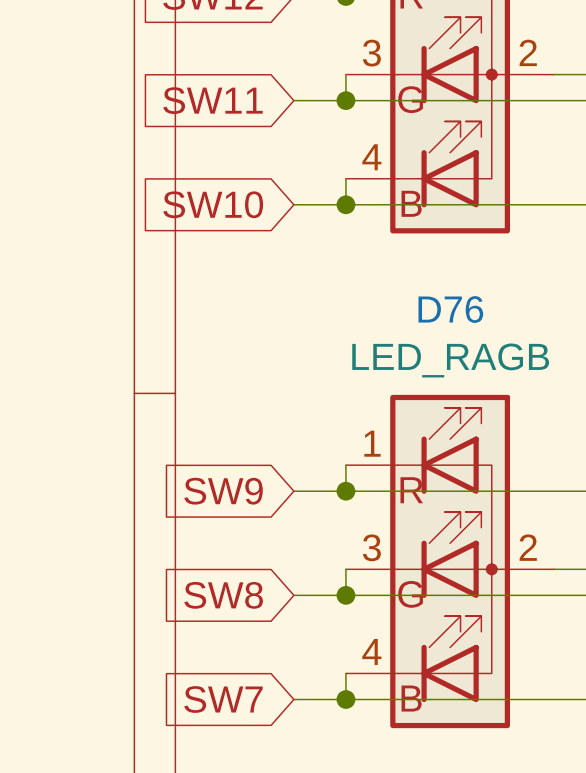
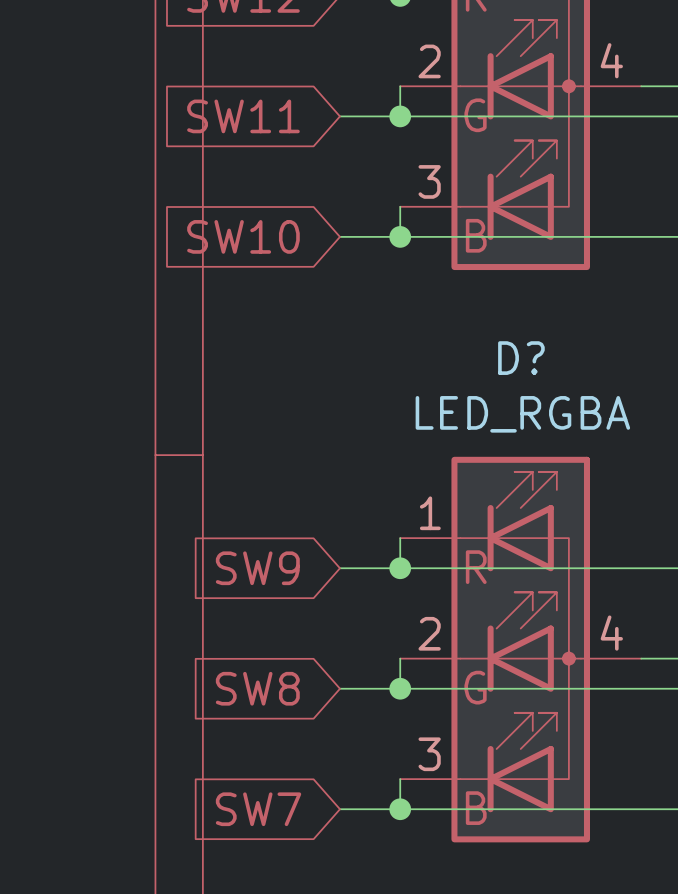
part pin number: 2 (528, 52) -> 4 (611, 60)
part pin number: 3 (371, 53) -> 2 (429, 61)
part pin number: 4 (371, 157) -> 3 (429, 181)
D76 name: D76 (450, 309) -> D? (521, 358)
D76 value: LED_RAGB (450, 360) -> LED_RGBA (522, 414)
D76 pin number: 3 (371, 547) -> 2 (429, 633)
D76 pin number: 2 (528, 547) -> 4 (611, 633)
D76 pin number: 4 (371, 651) -> 3 (429, 754)

